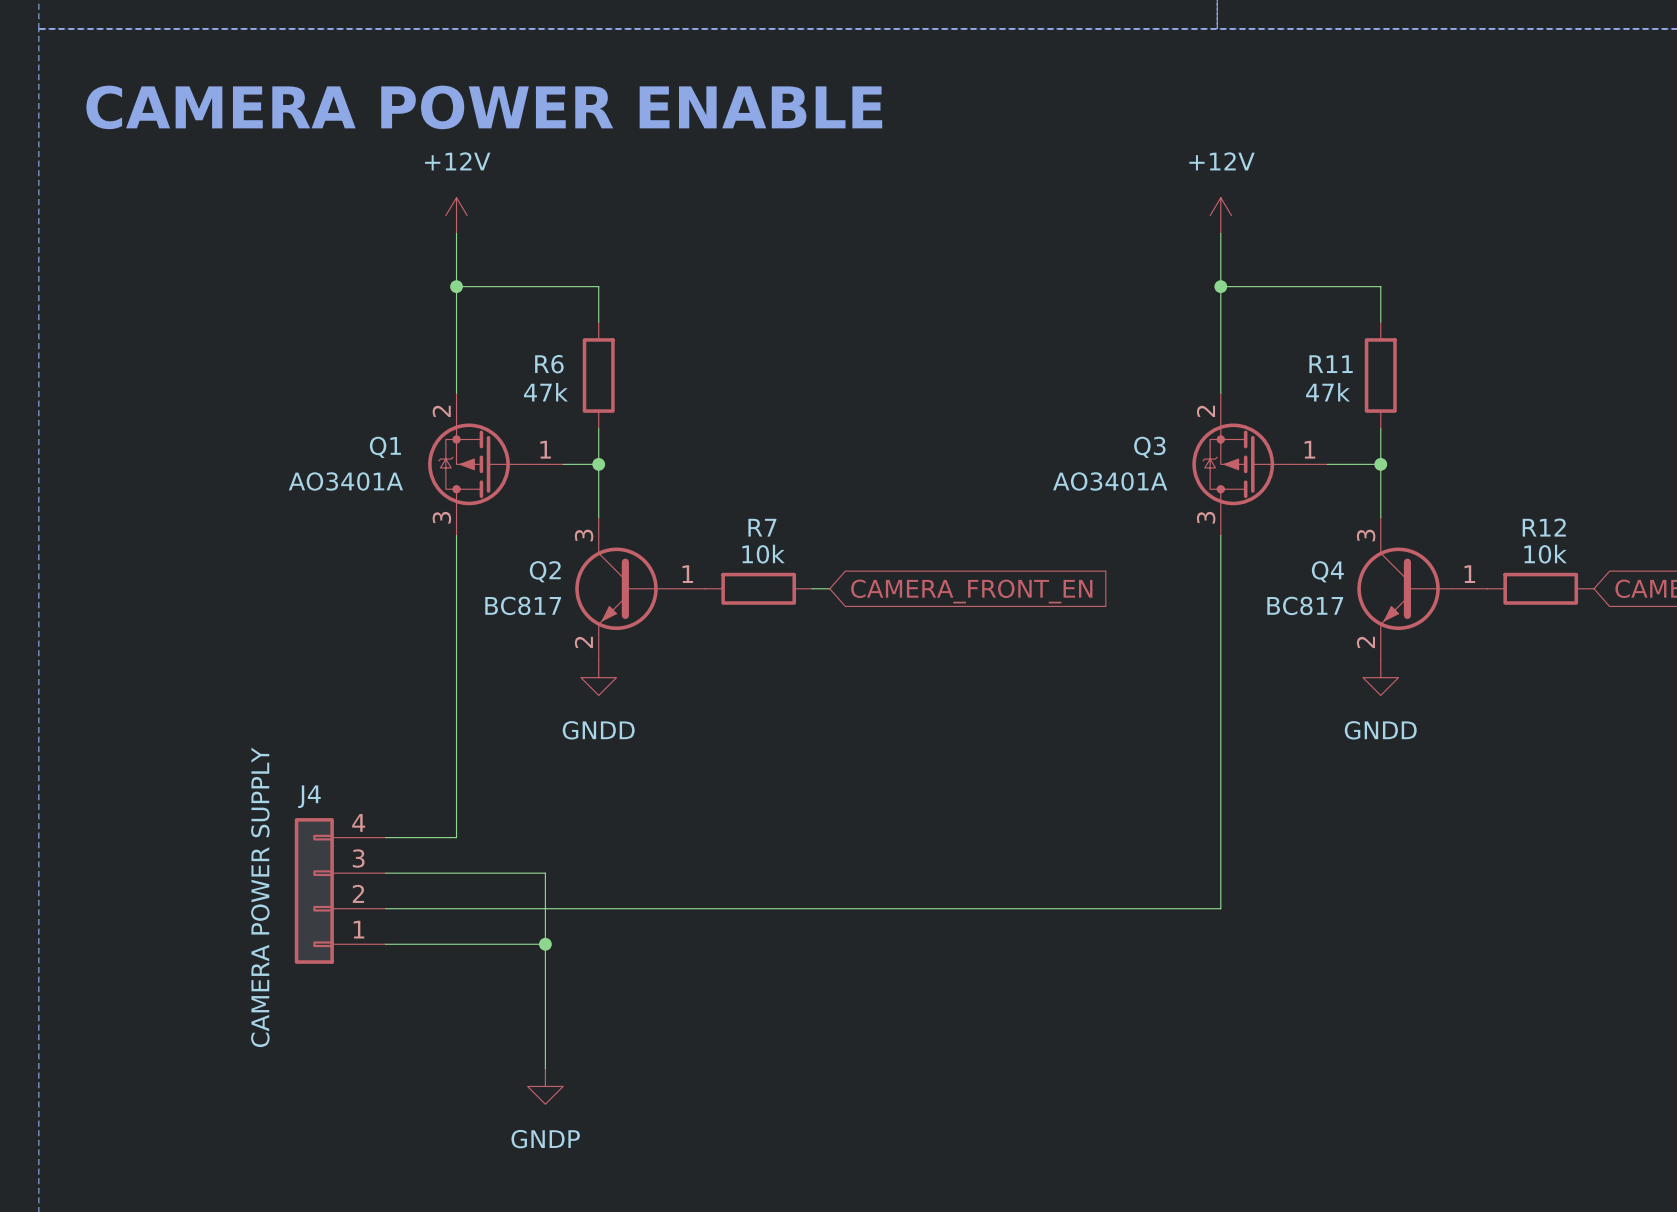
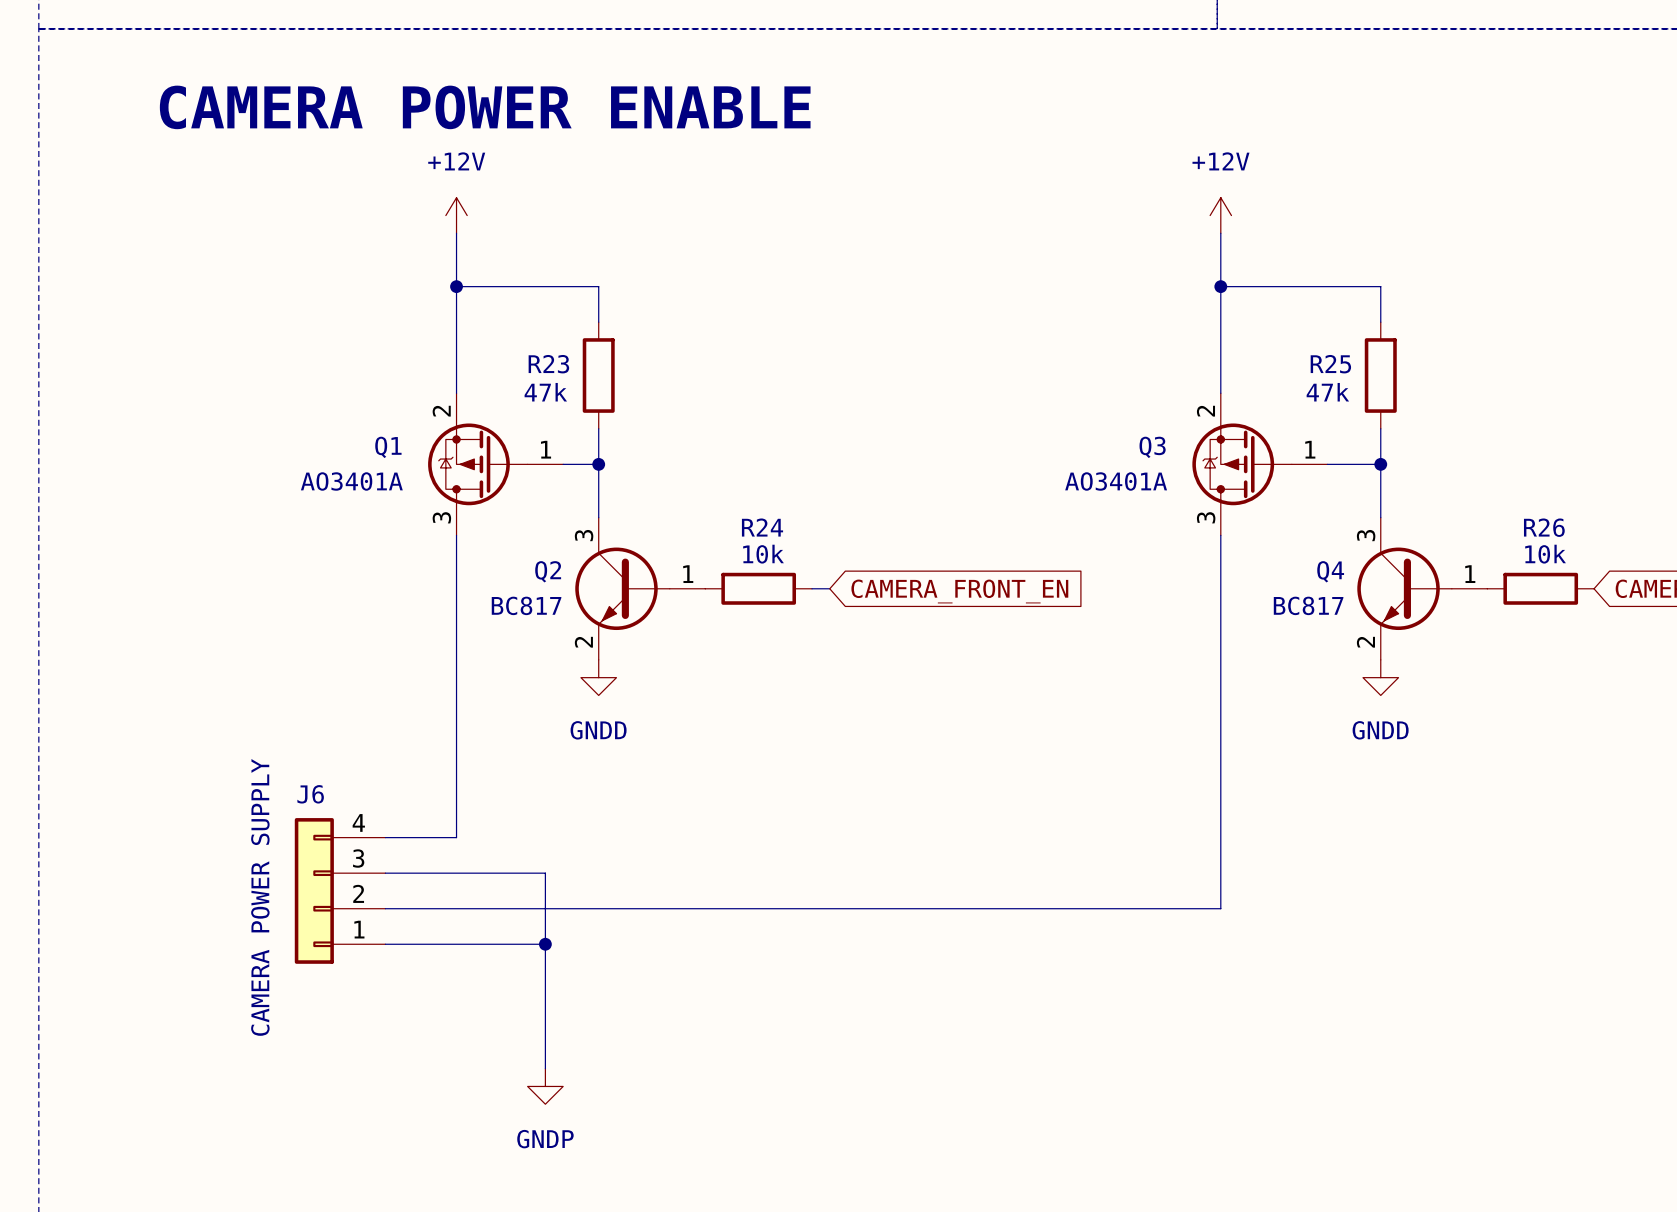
R6 name: R6 (549, 364) -> R23 (548, 364)
R11 name: R11 (1331, 364) -> R25 (1330, 364)
R7 name: R7 (762, 527) -> R24 (762, 527)
R12 name: R12 (1544, 527) -> R26 (1544, 527)
J4 name: J4 (309, 796) -> J6 (310, 794)

